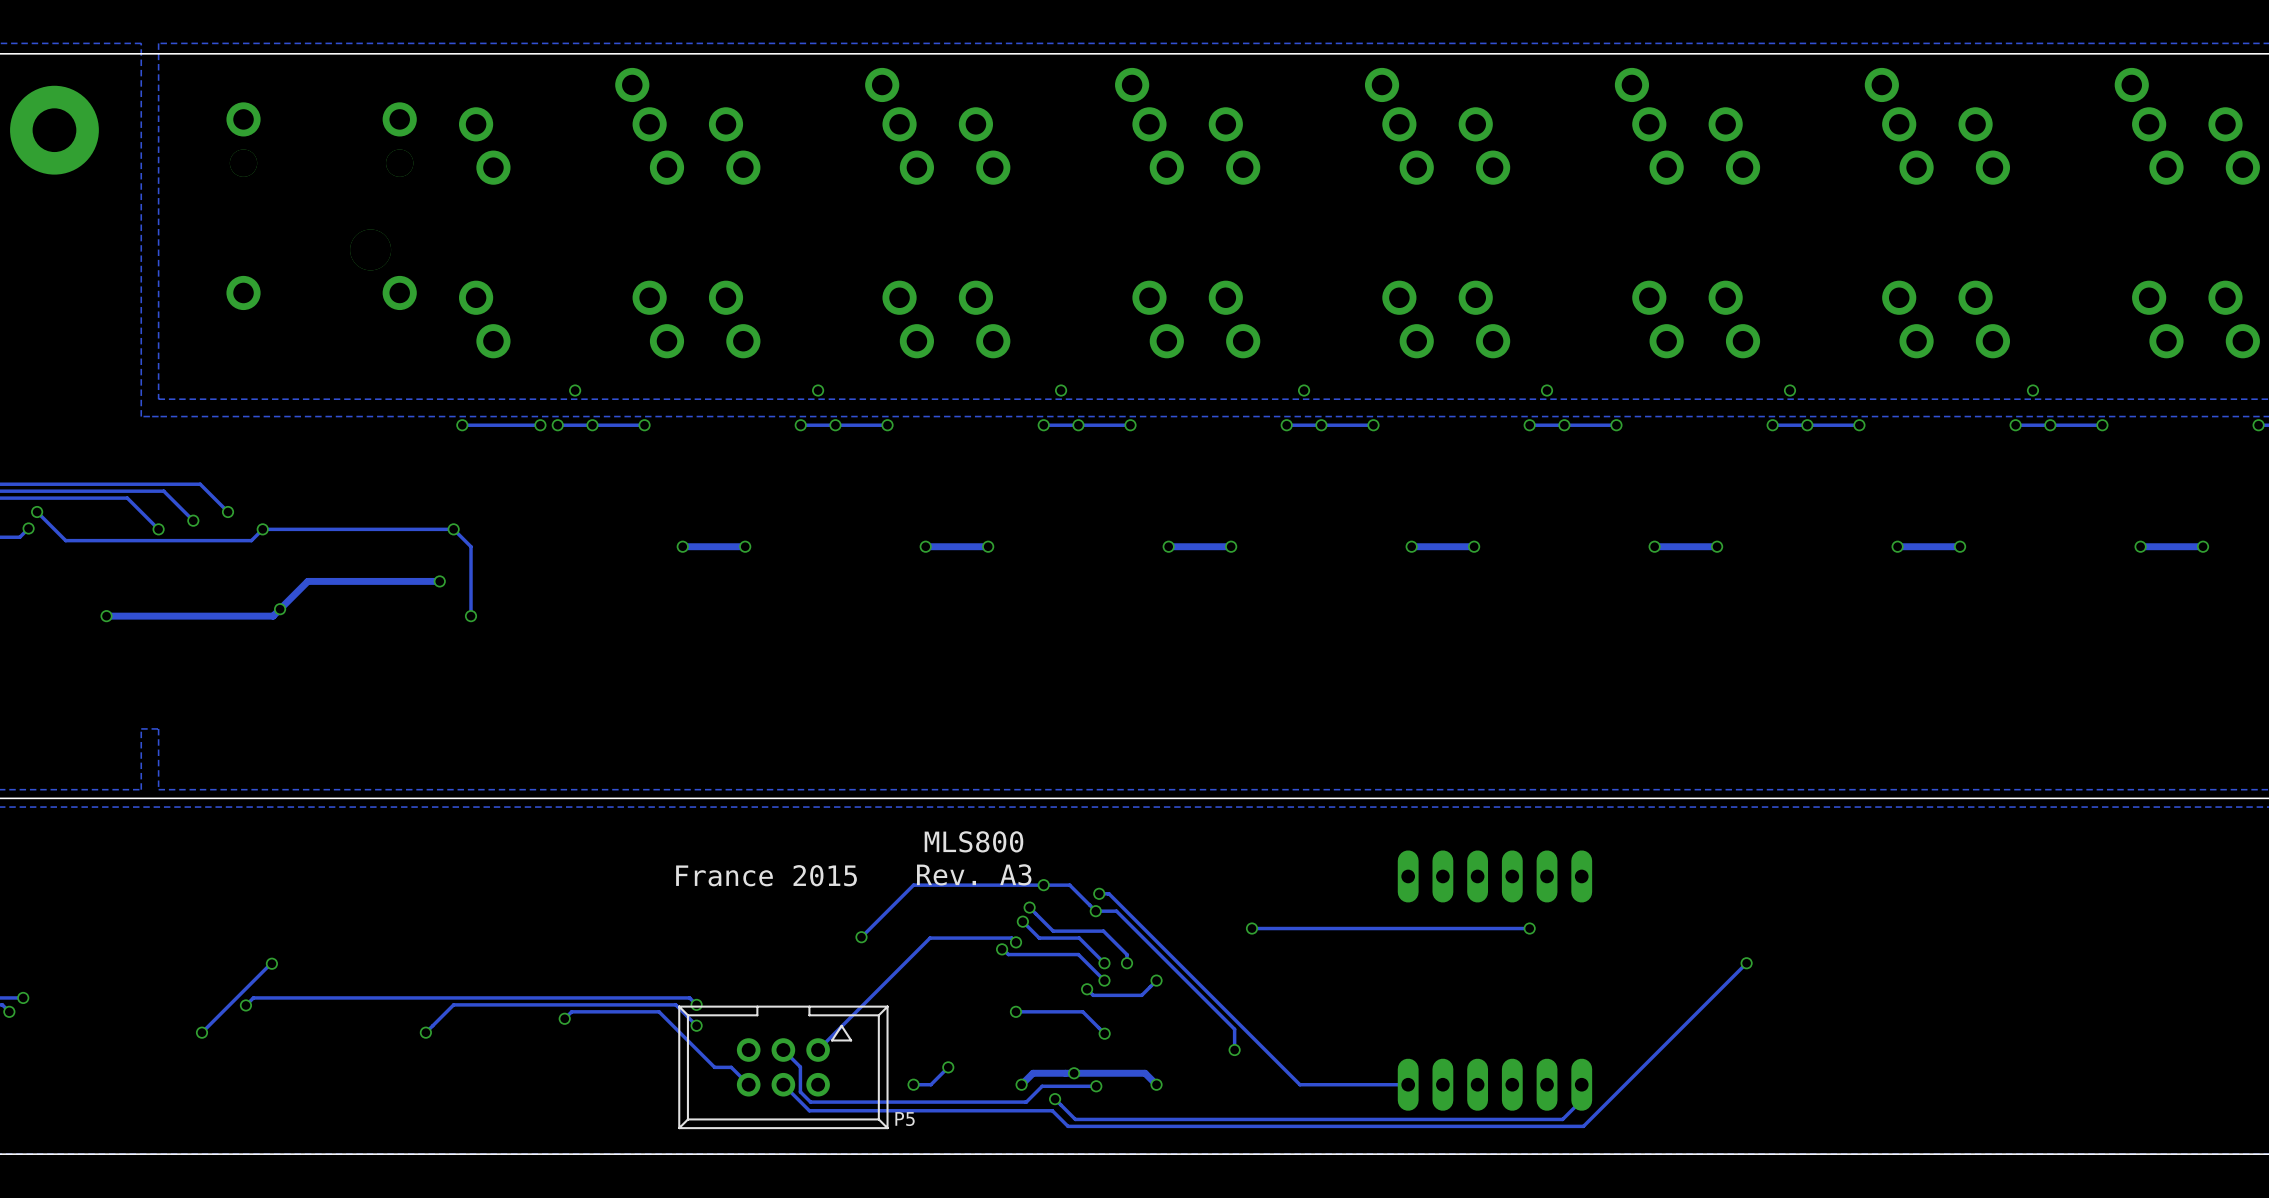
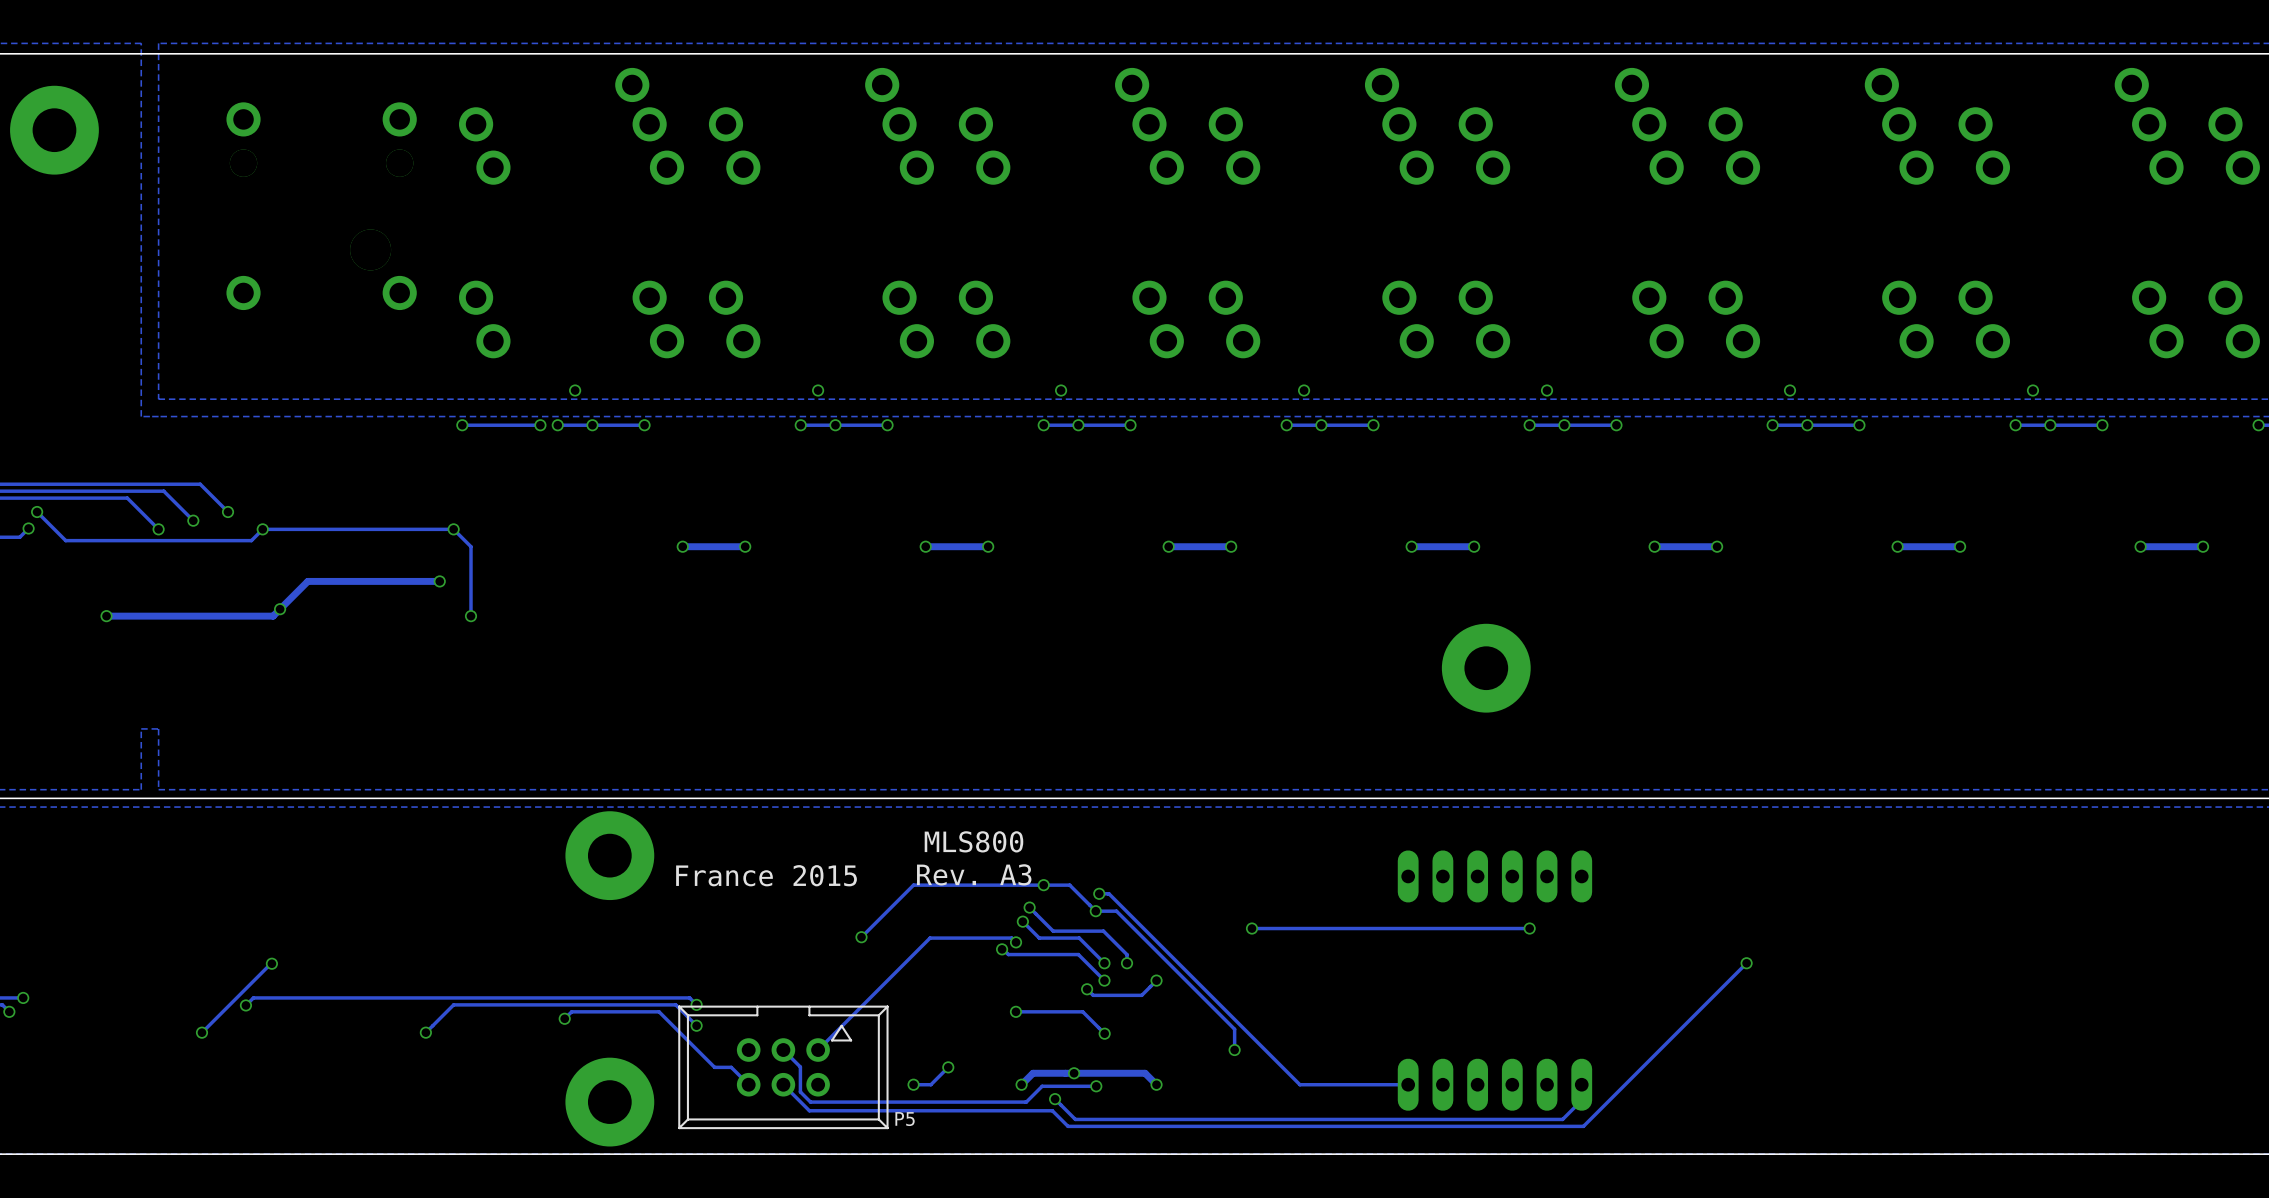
part: none -> (1486, 668)
part: none -> (609, 855)
part: none -> (609, 1102)

